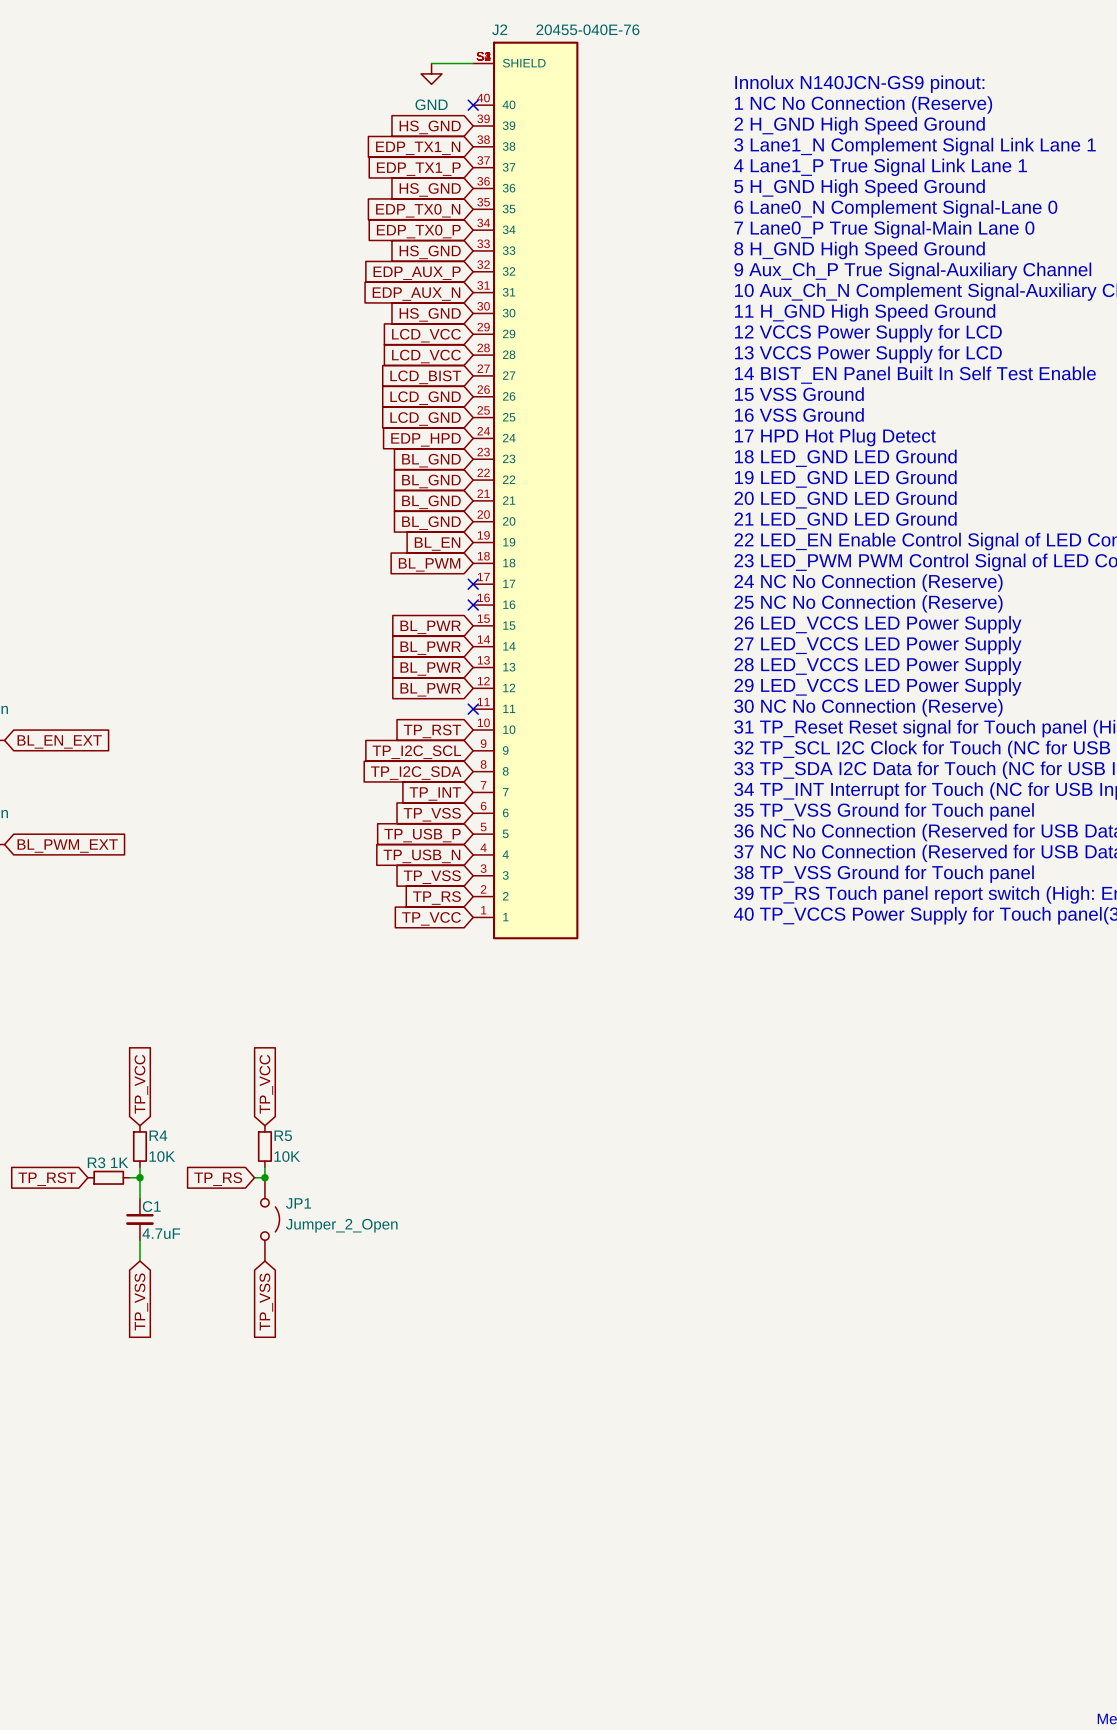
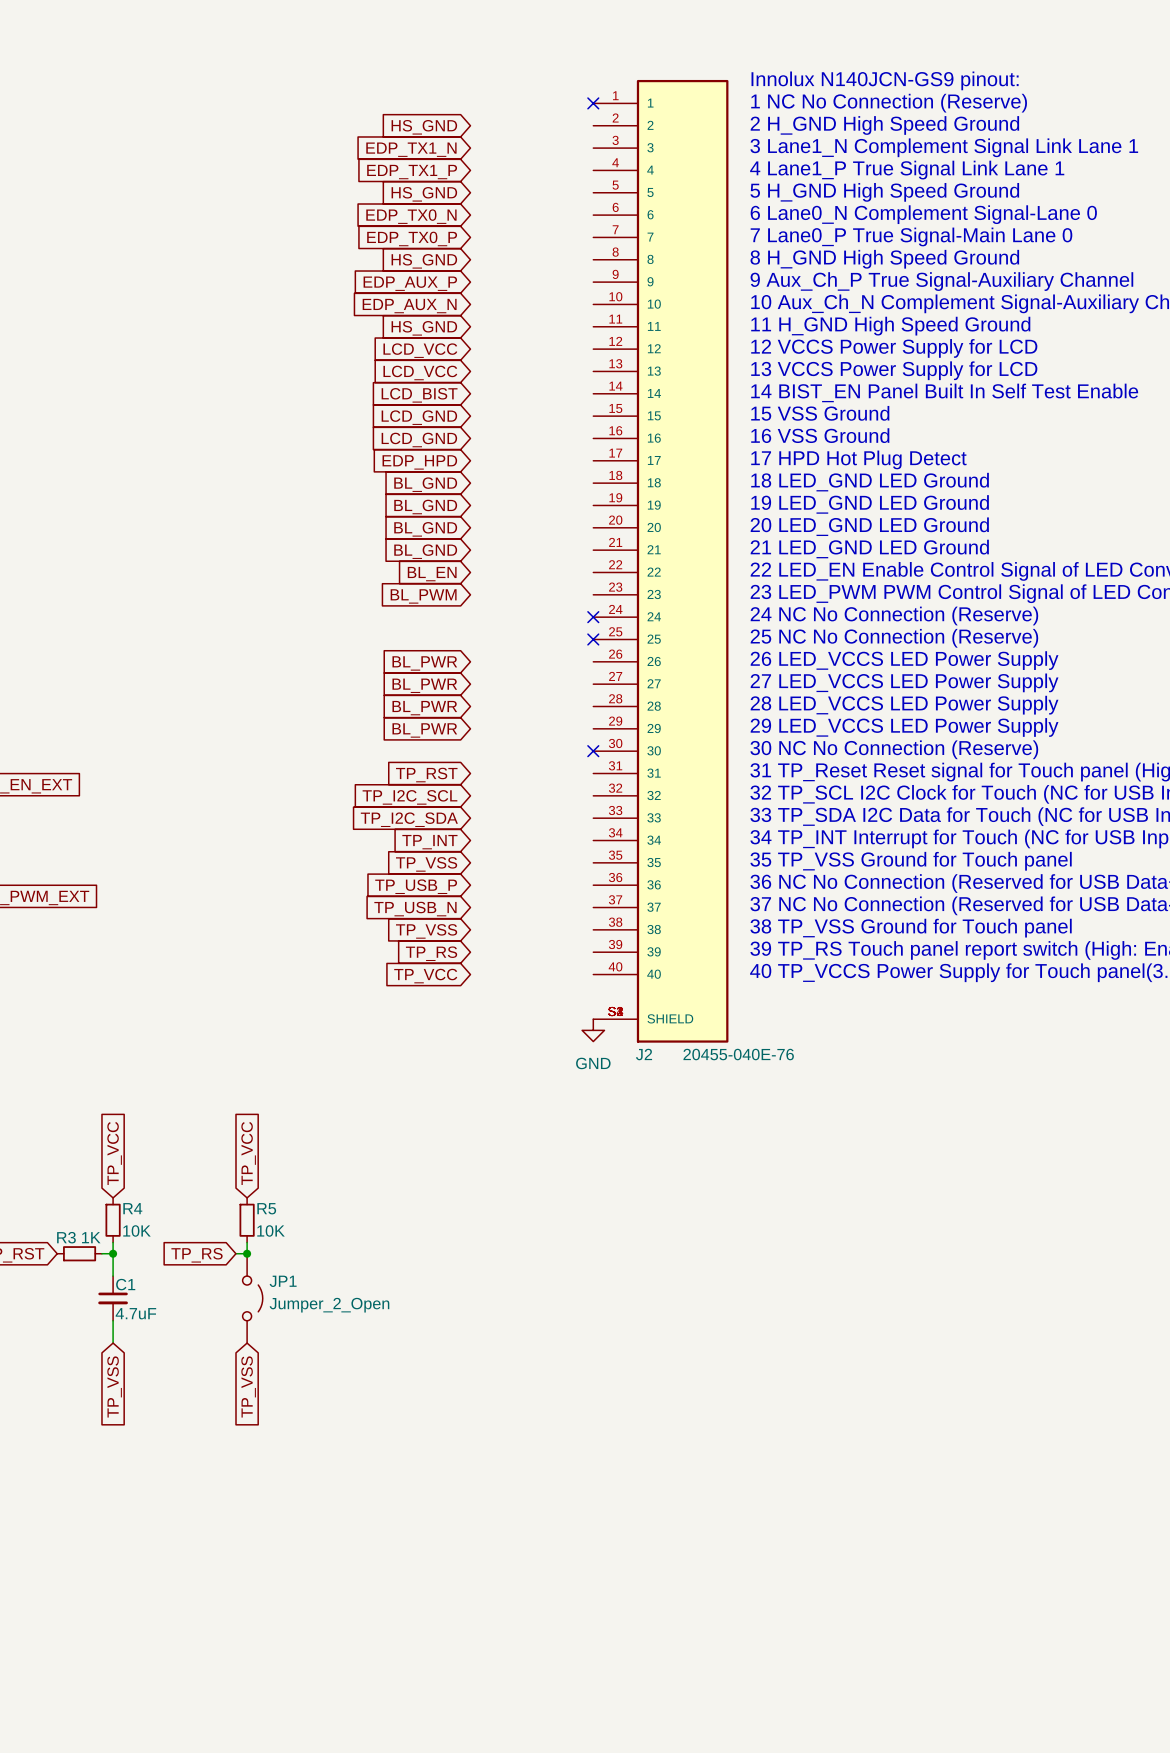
J2 name position: J2 (499, 29) -> J2 (644, 1054)
J2 value position: 20455-040E-76 (587, 29) -> 20455-040E-76 (738, 1054)
J2 symbol: [473, 41, 579, 940] -> [593, 79, 729, 1043]
wire: (431, 63) (473, 63) -> none
power symbol: GND (431, 73) -> none
no-connect mark: (473, 105) -> none
no-connect mark: none -> (593, 103)
no-connect mark: (473, 584) -> none
no-connect mark: none -> (593, 617)
no-connect mark: (473, 605) -> none
no-connect mark: none -> (593, 639)
no-connect mark: (473, 709) -> none
no-connect mark: none -> (593, 751)
power symbol: none -> GND (593, 1030)

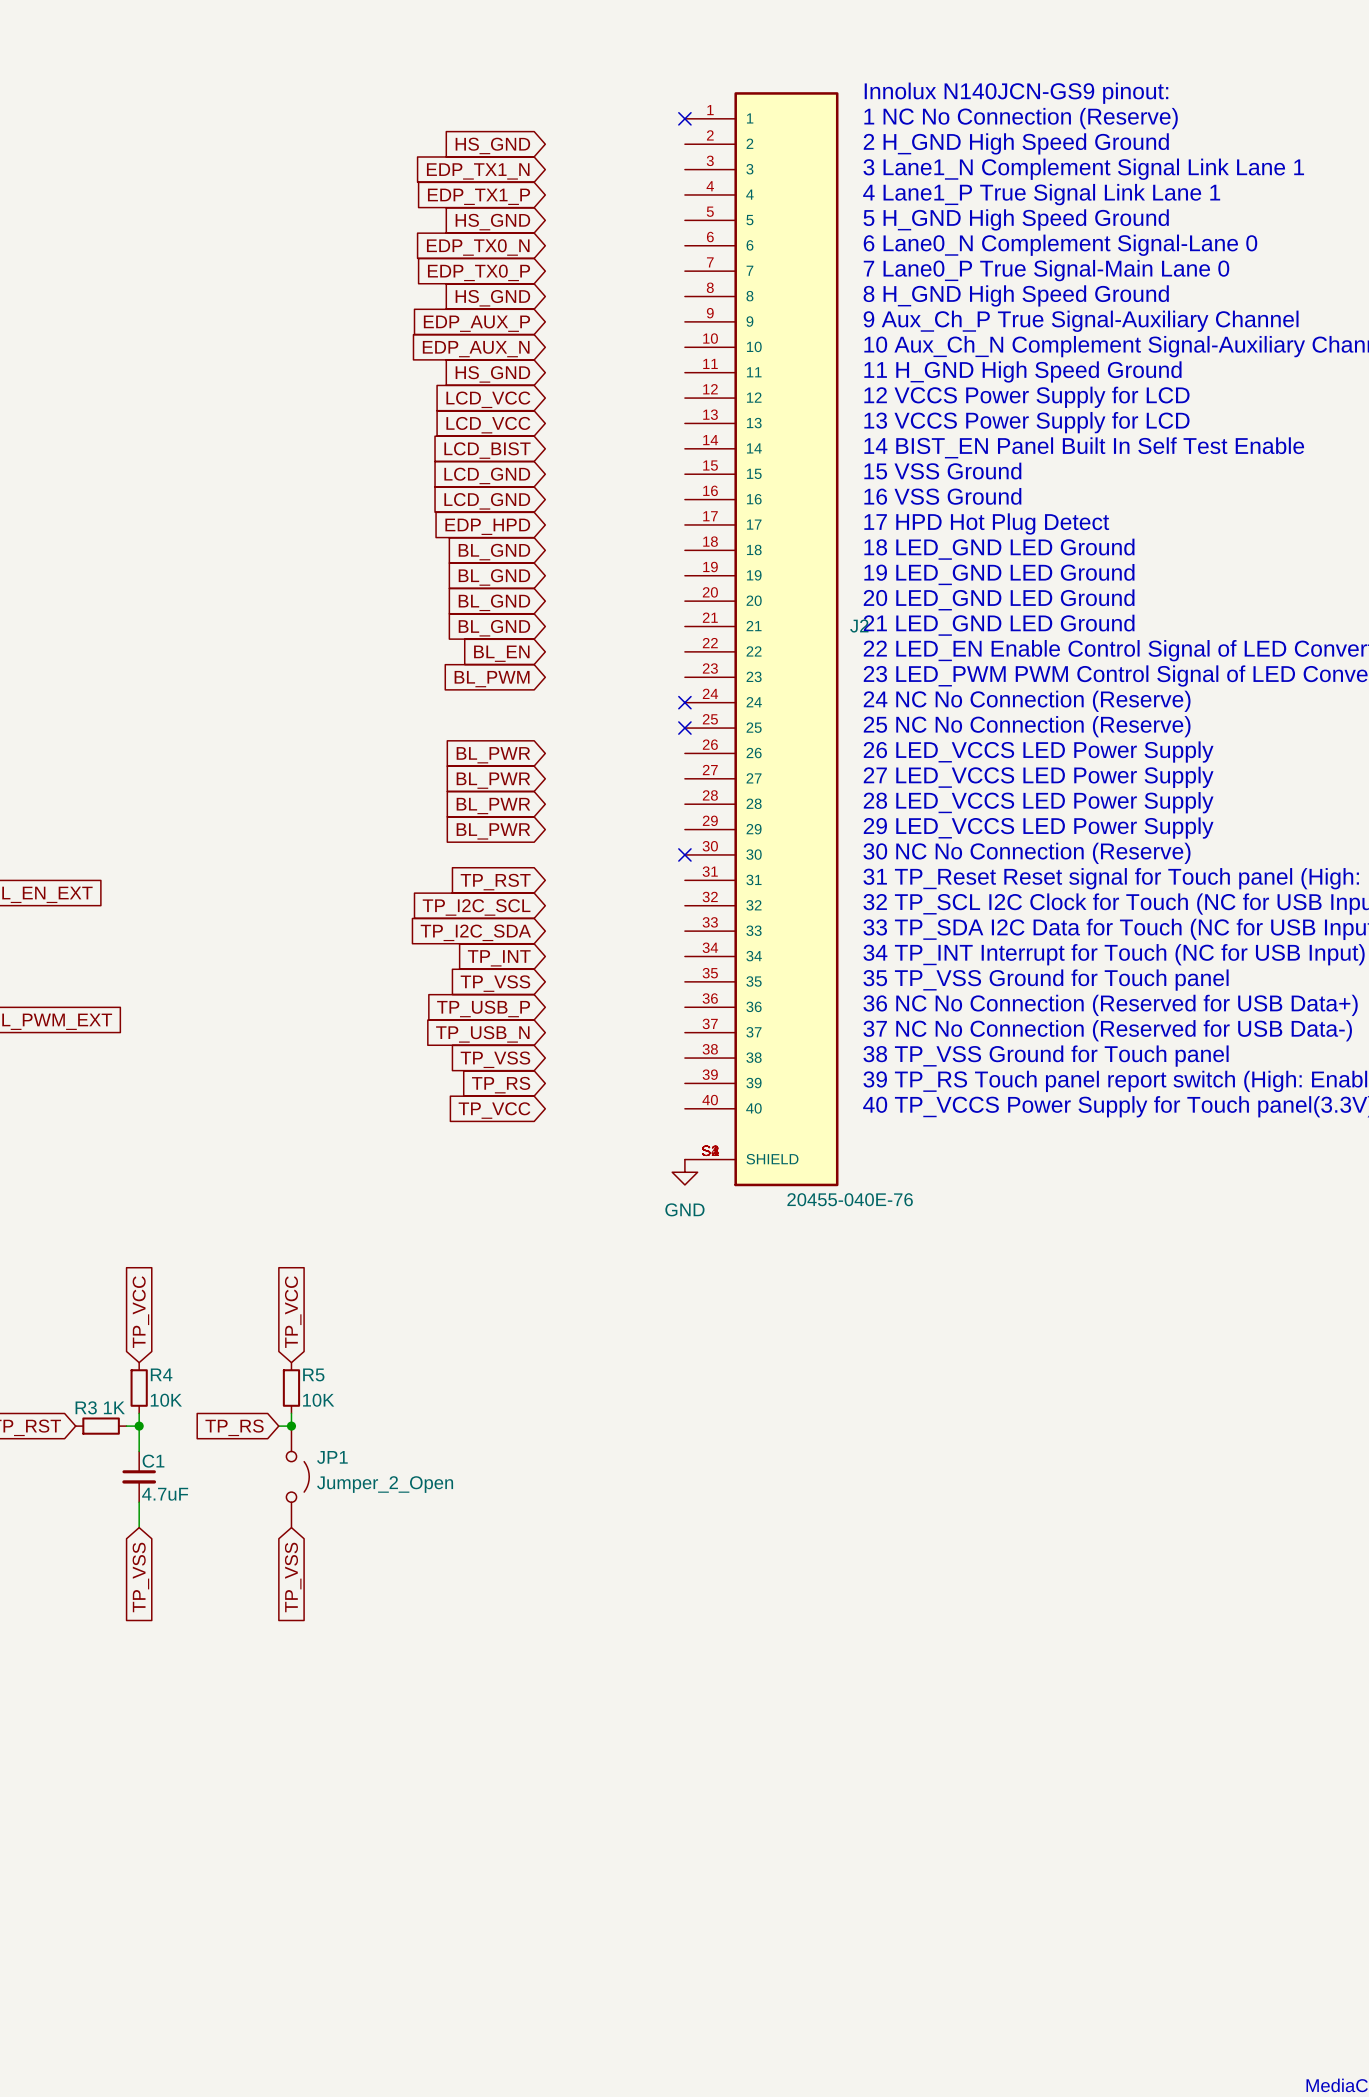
J2 name position: J2 (644, 1054) -> J2 (859, 626)

